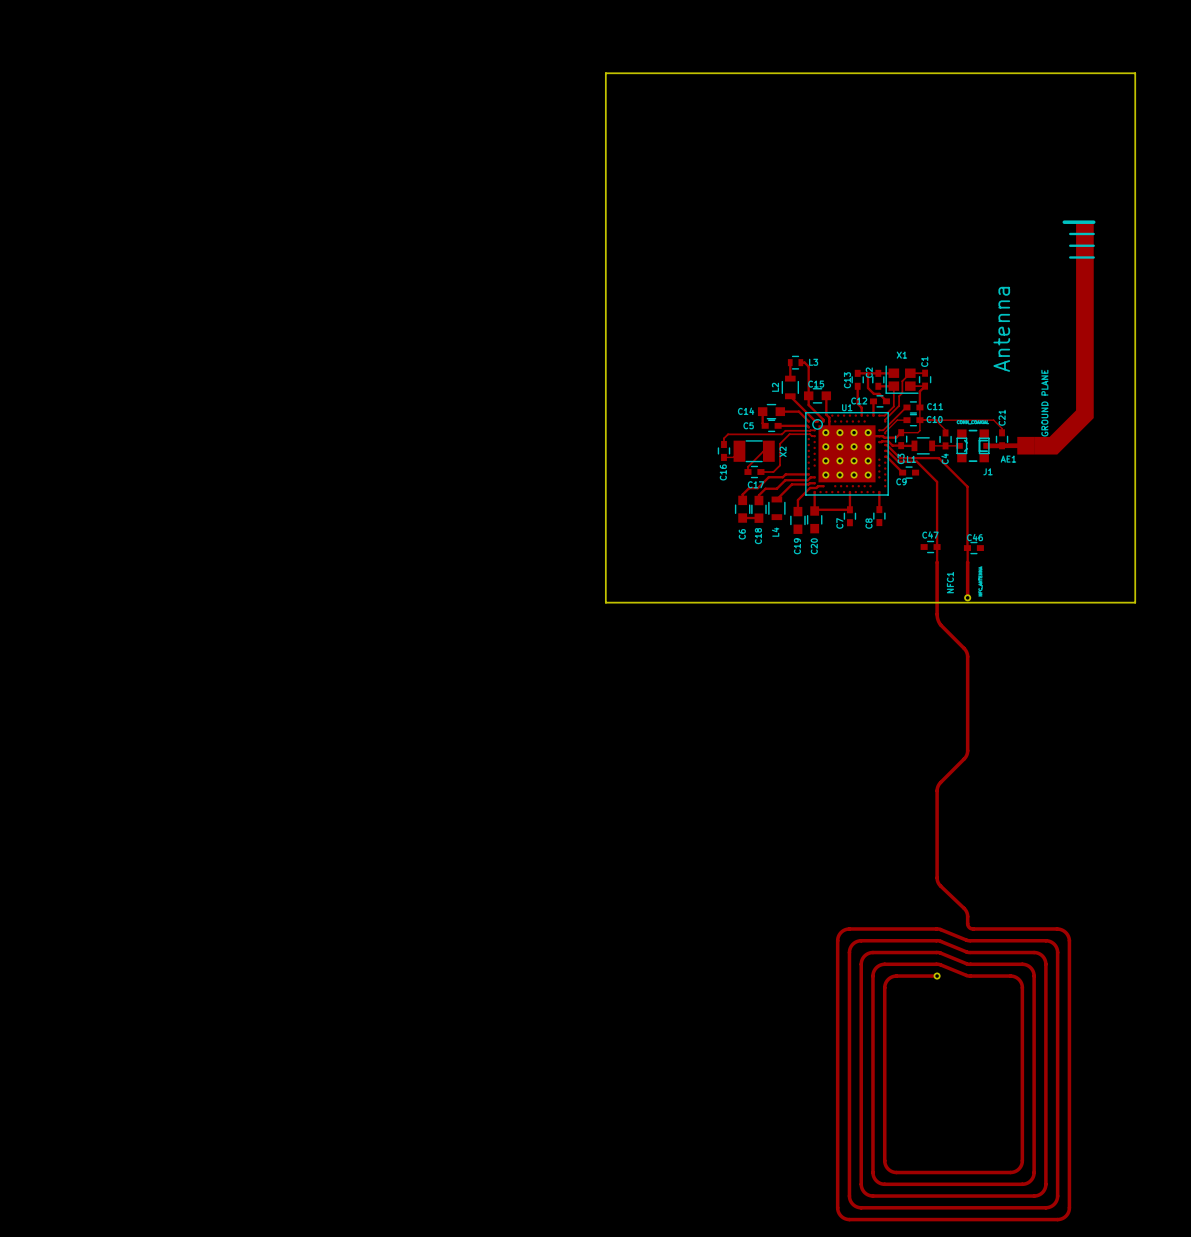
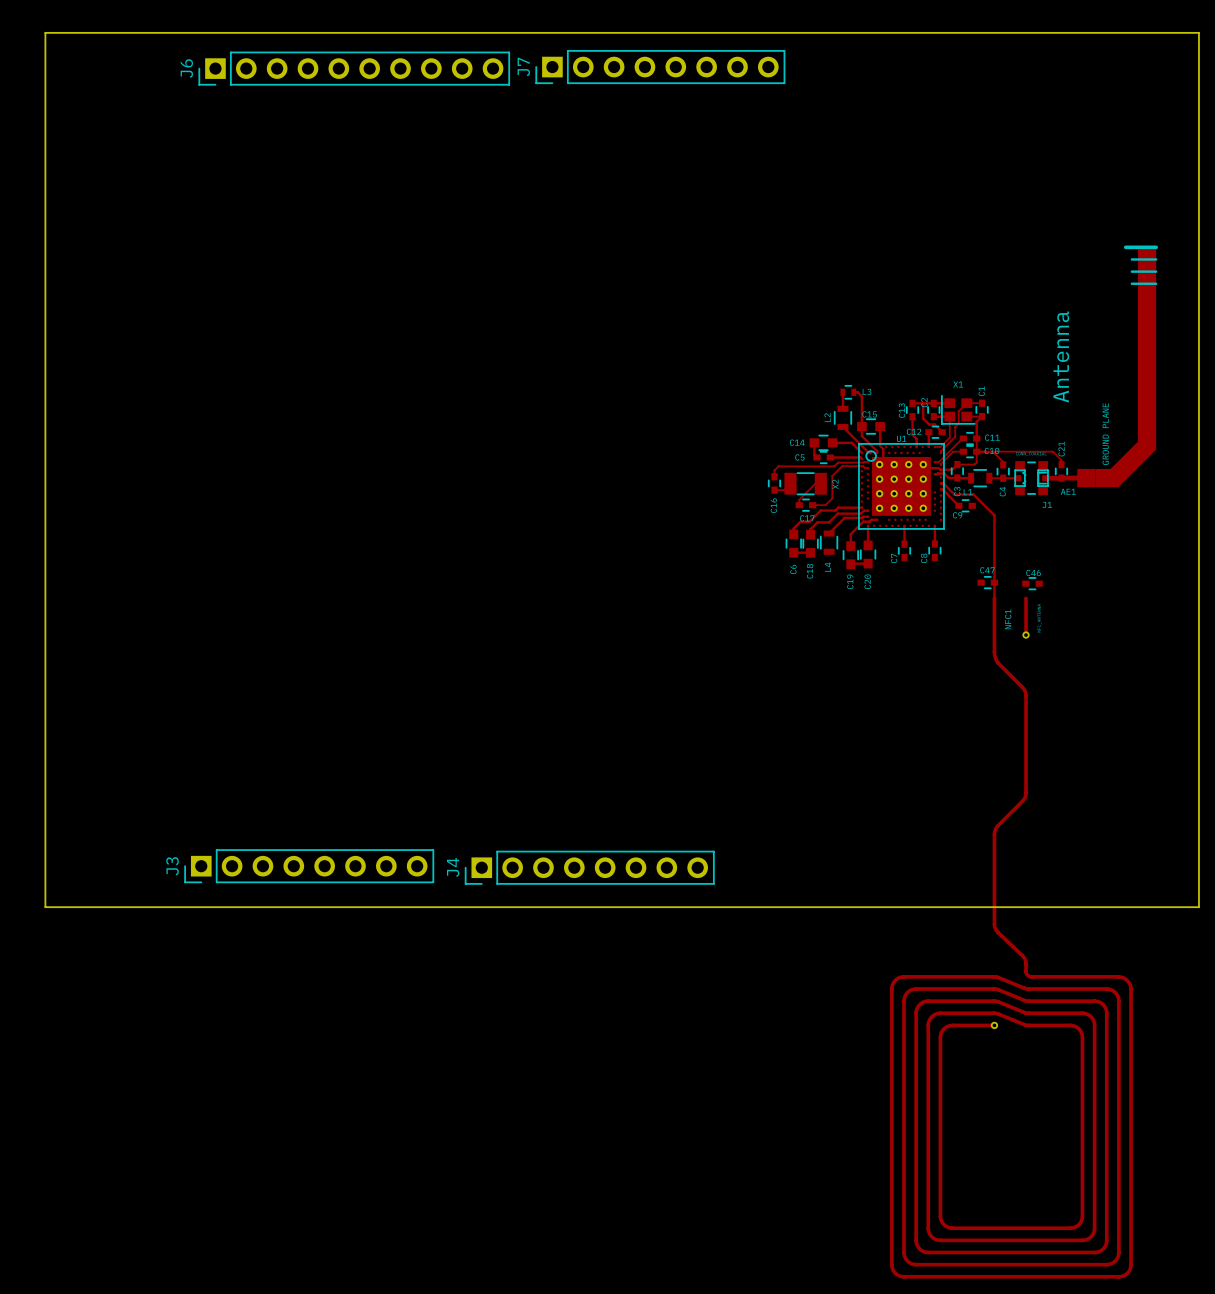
J7: none -> (660, 67)
J6: none -> (354, 68)
board edge: (1135, 73) (605, 73) (605, 602) (1135, 602) -> (1198, 93) (1198, 32) (45, 32) (45, 907) (1198, 907) (1198, 640)
track: (885, 445) (899, 458) (938, 458) (967, 486) (967, 562) -> none
track: (815, 509) (849, 509) -> none
track: none -> (868, 563) (850, 564)
J3: none -> (309, 866)
J4: none -> (589, 867)

